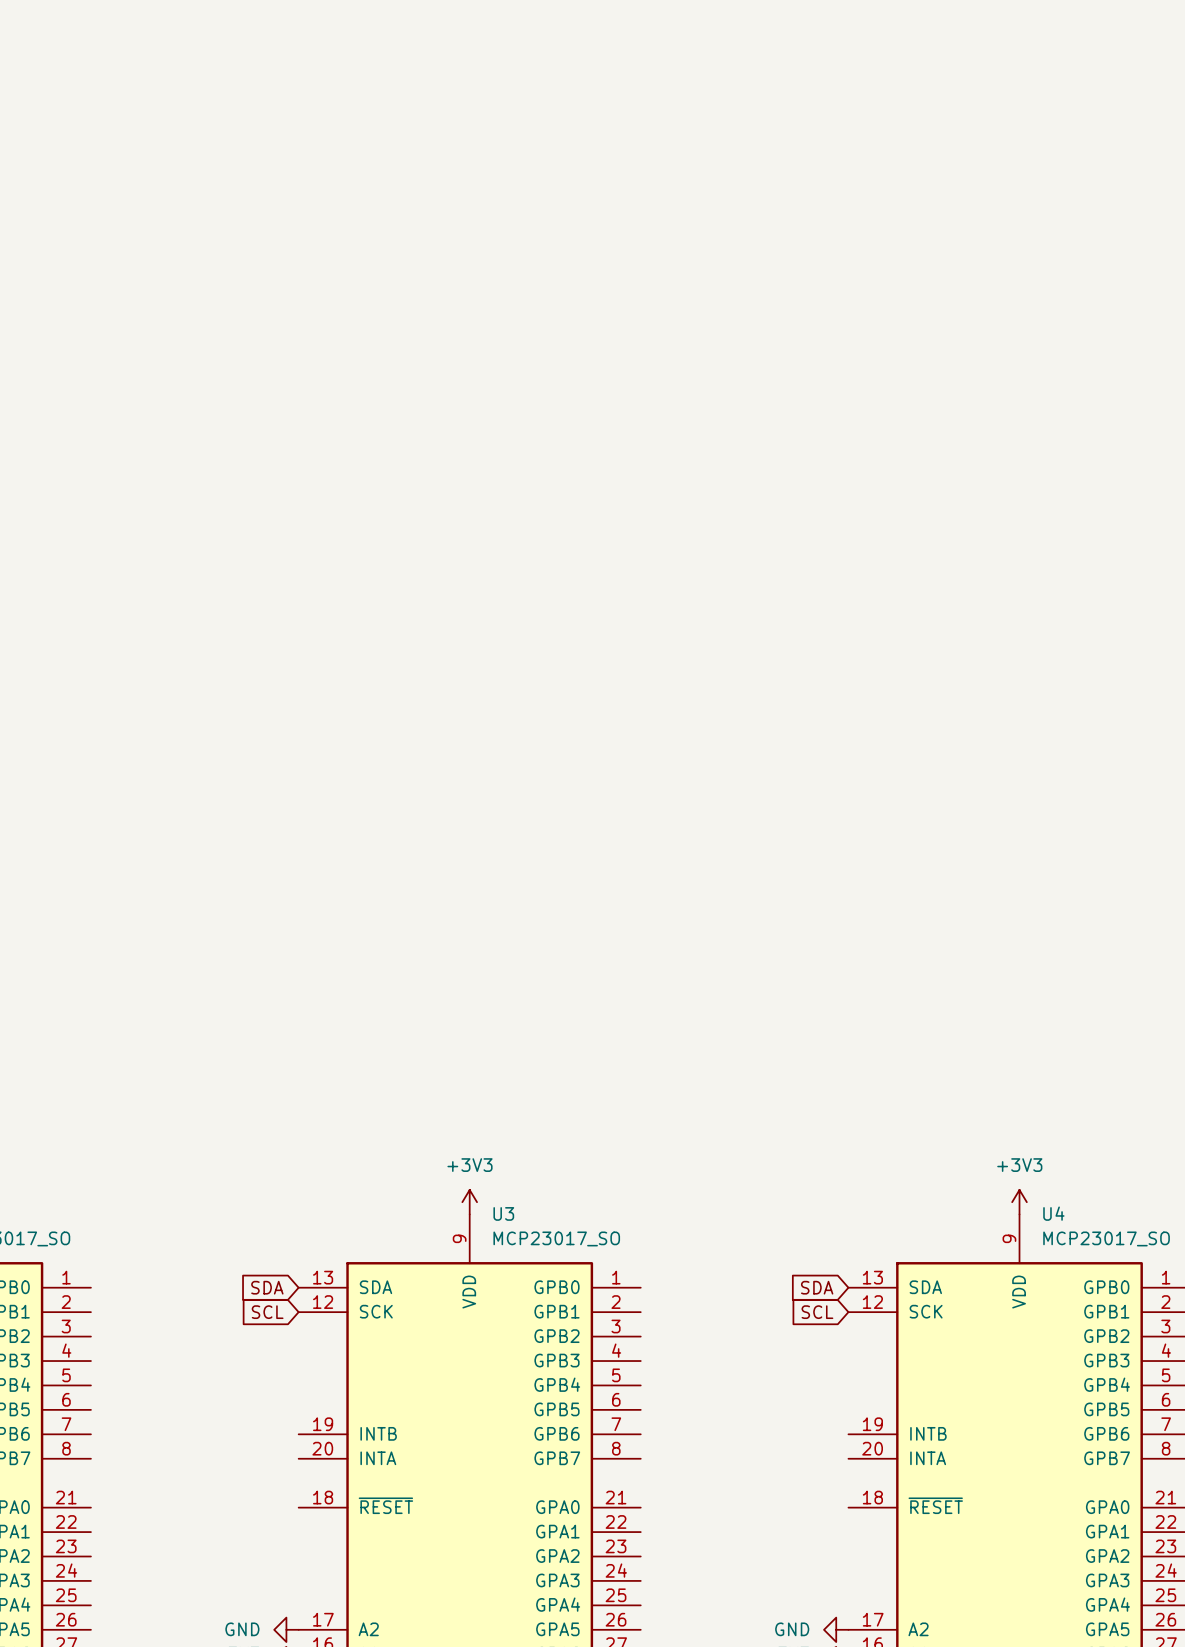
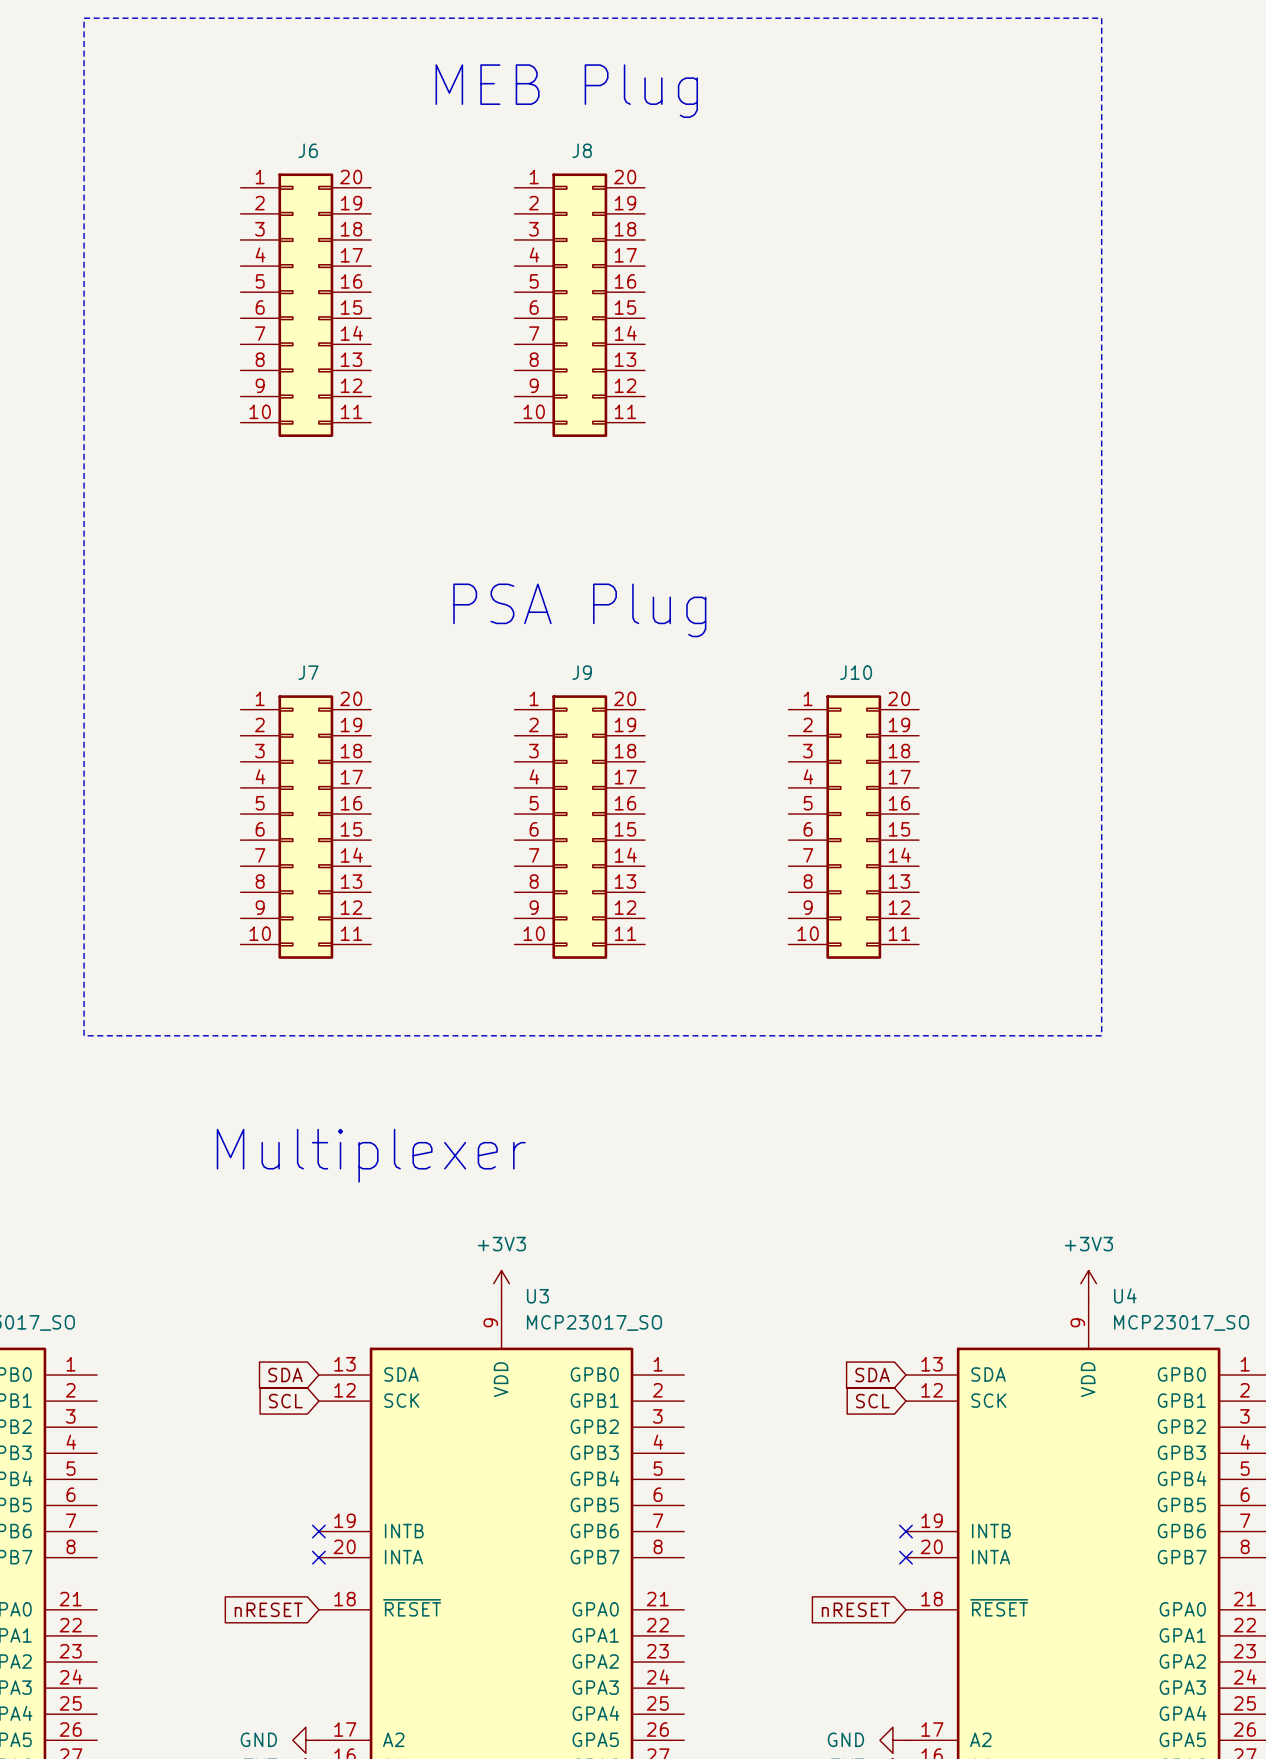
line: none -> (84, 18) (1101, 18) (1101, 1035) (84, 1035) (84, 18)
text: none -> MEB Plug (566, 91)
J6: none -> (305, 305)
J8: none -> (579, 305)
text: none -> PSA Plug (579, 610)
J7: none -> (305, 827)
J9: none -> (579, 827)
J10: none -> (853, 827)
text: none -> Multiplexer (371, 1155)
no-connect mark: none -> (318, 1531)
no-connect mark: none -> (905, 1531)
no-connect mark: none -> (318, 1557)
no-connect mark: none -> (905, 1557)
global label: none -> nRESET (268, 1609)
global label: none -> nRESET (855, 1609)

